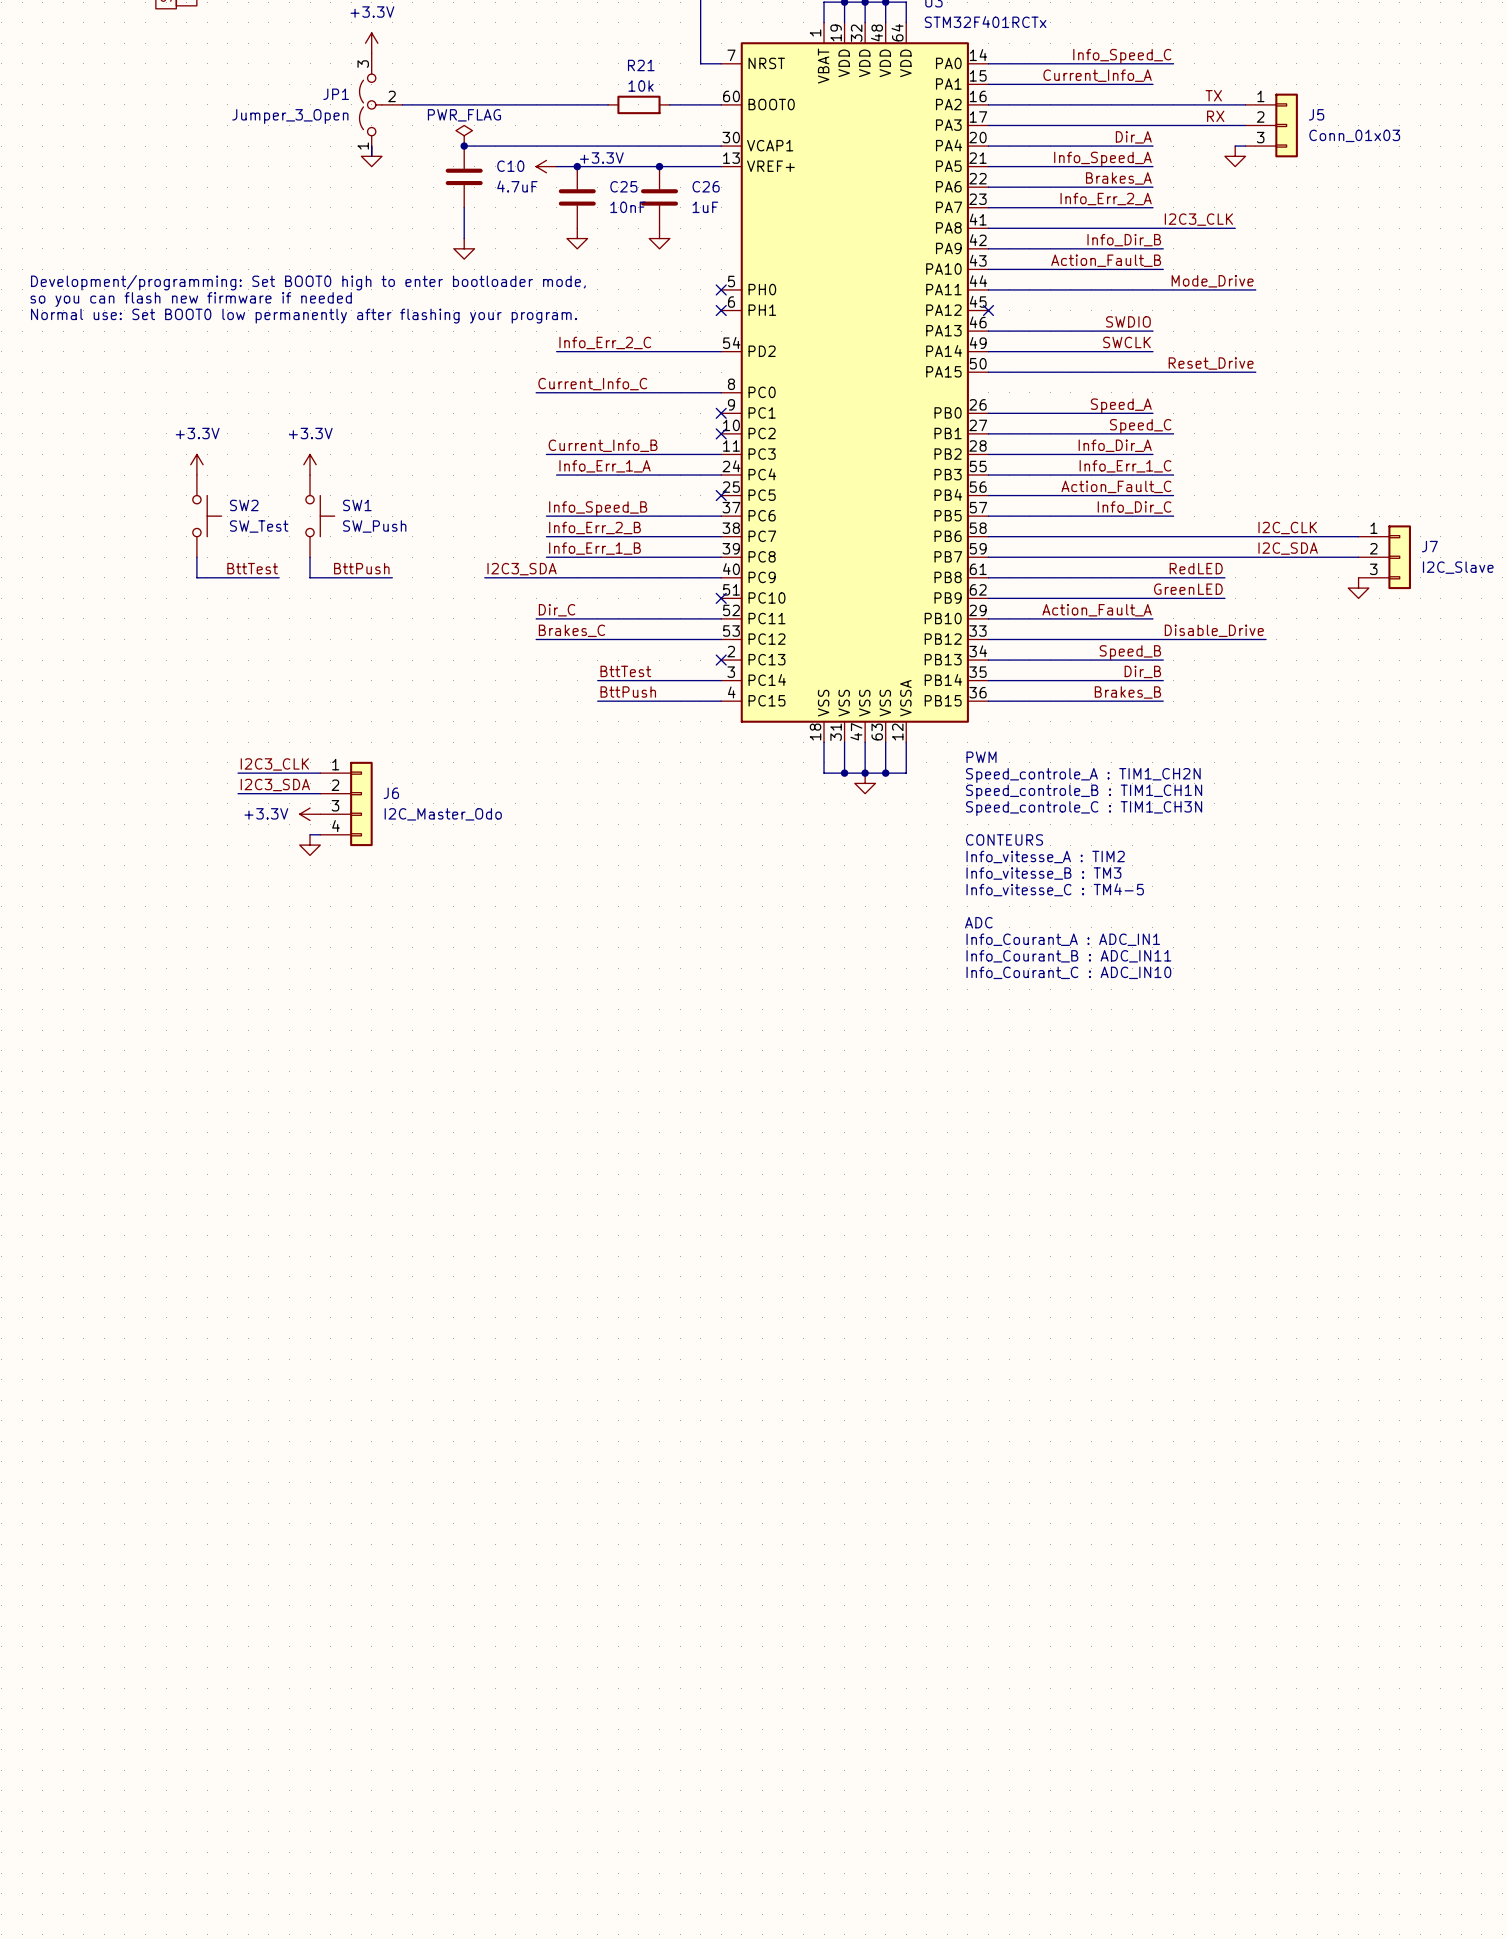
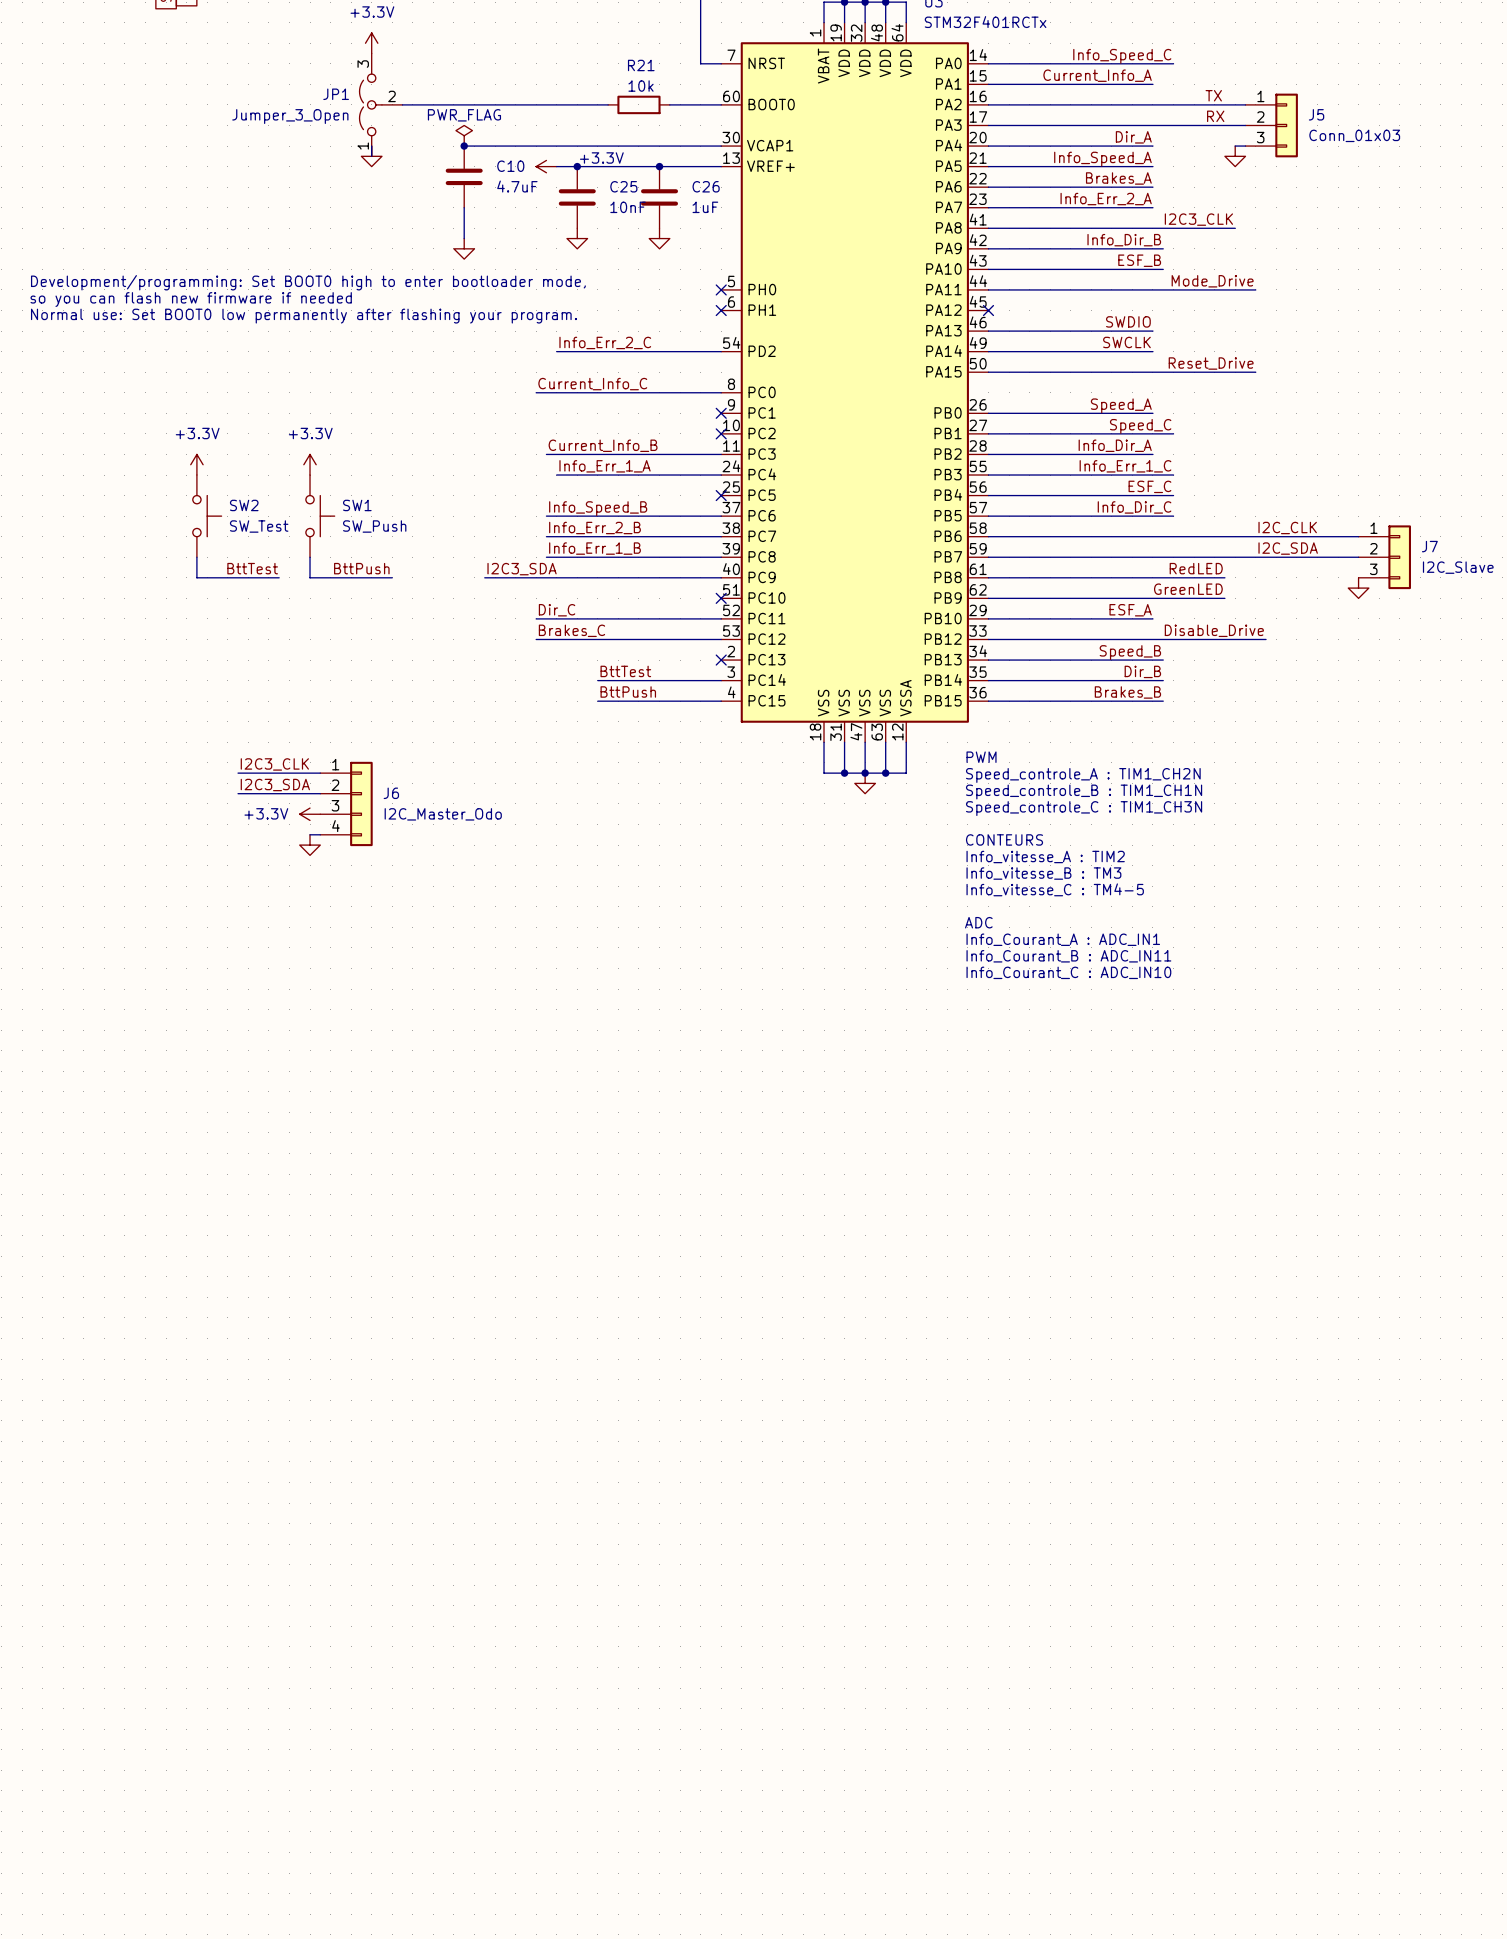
label: Action_Fault_B (1106, 260) -> ESF_B (1139, 260)
label: Action_Fault_C (1116, 486) -> ESF_C (1149, 486)
label: Action_Fault_A (1097, 610) -> ESF_A (1130, 610)

